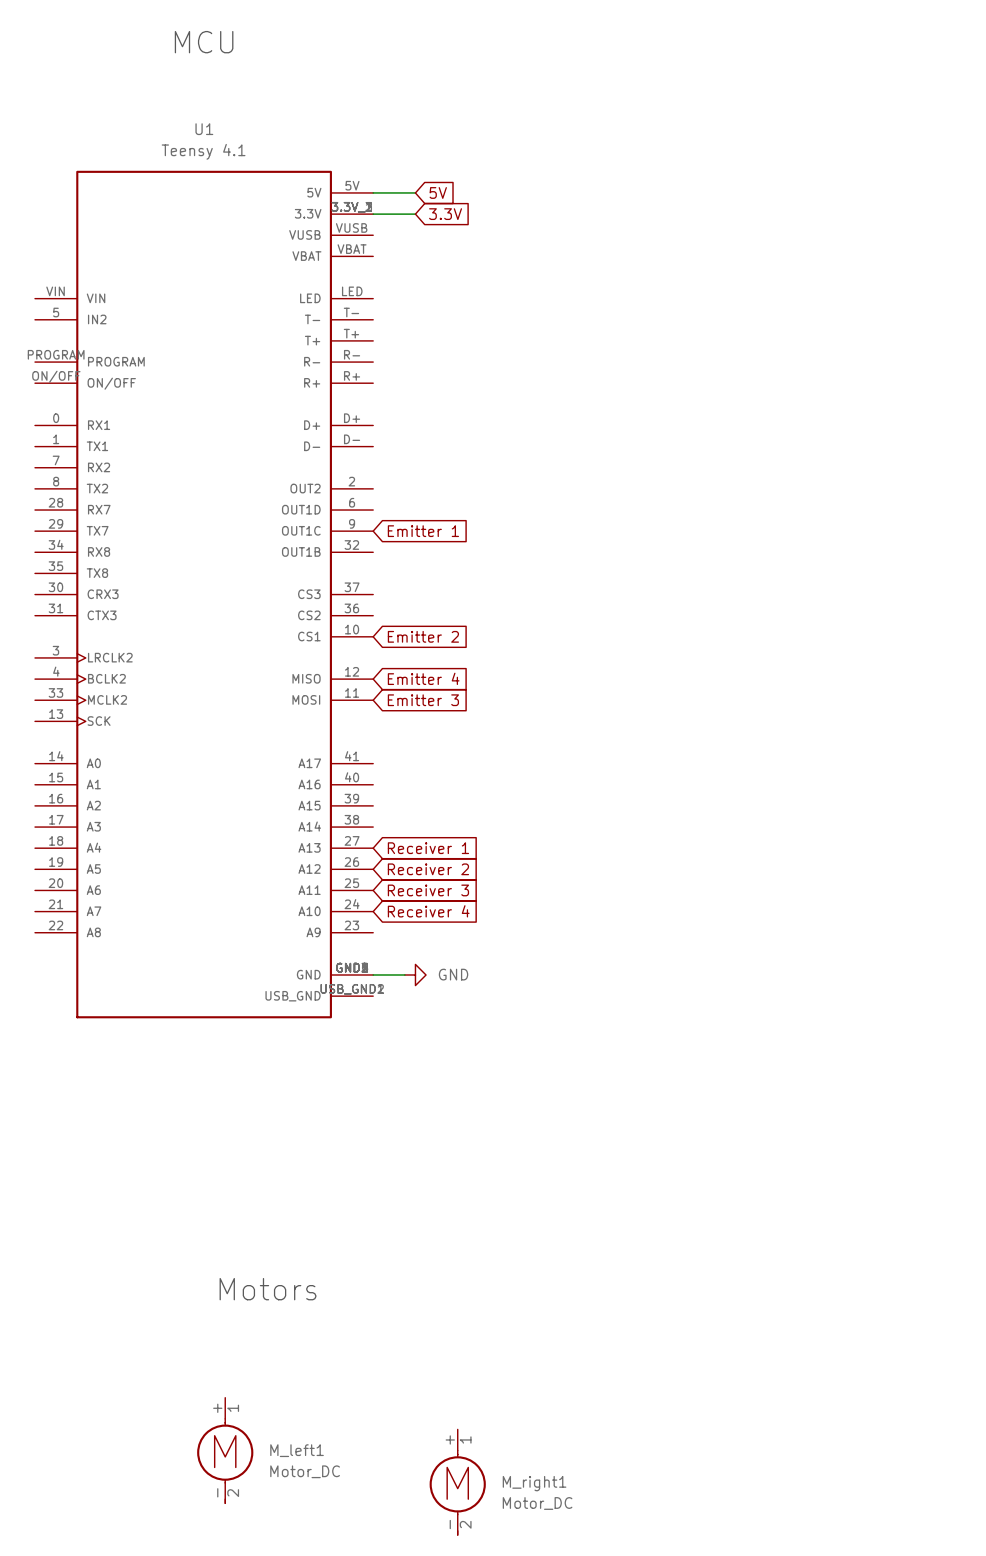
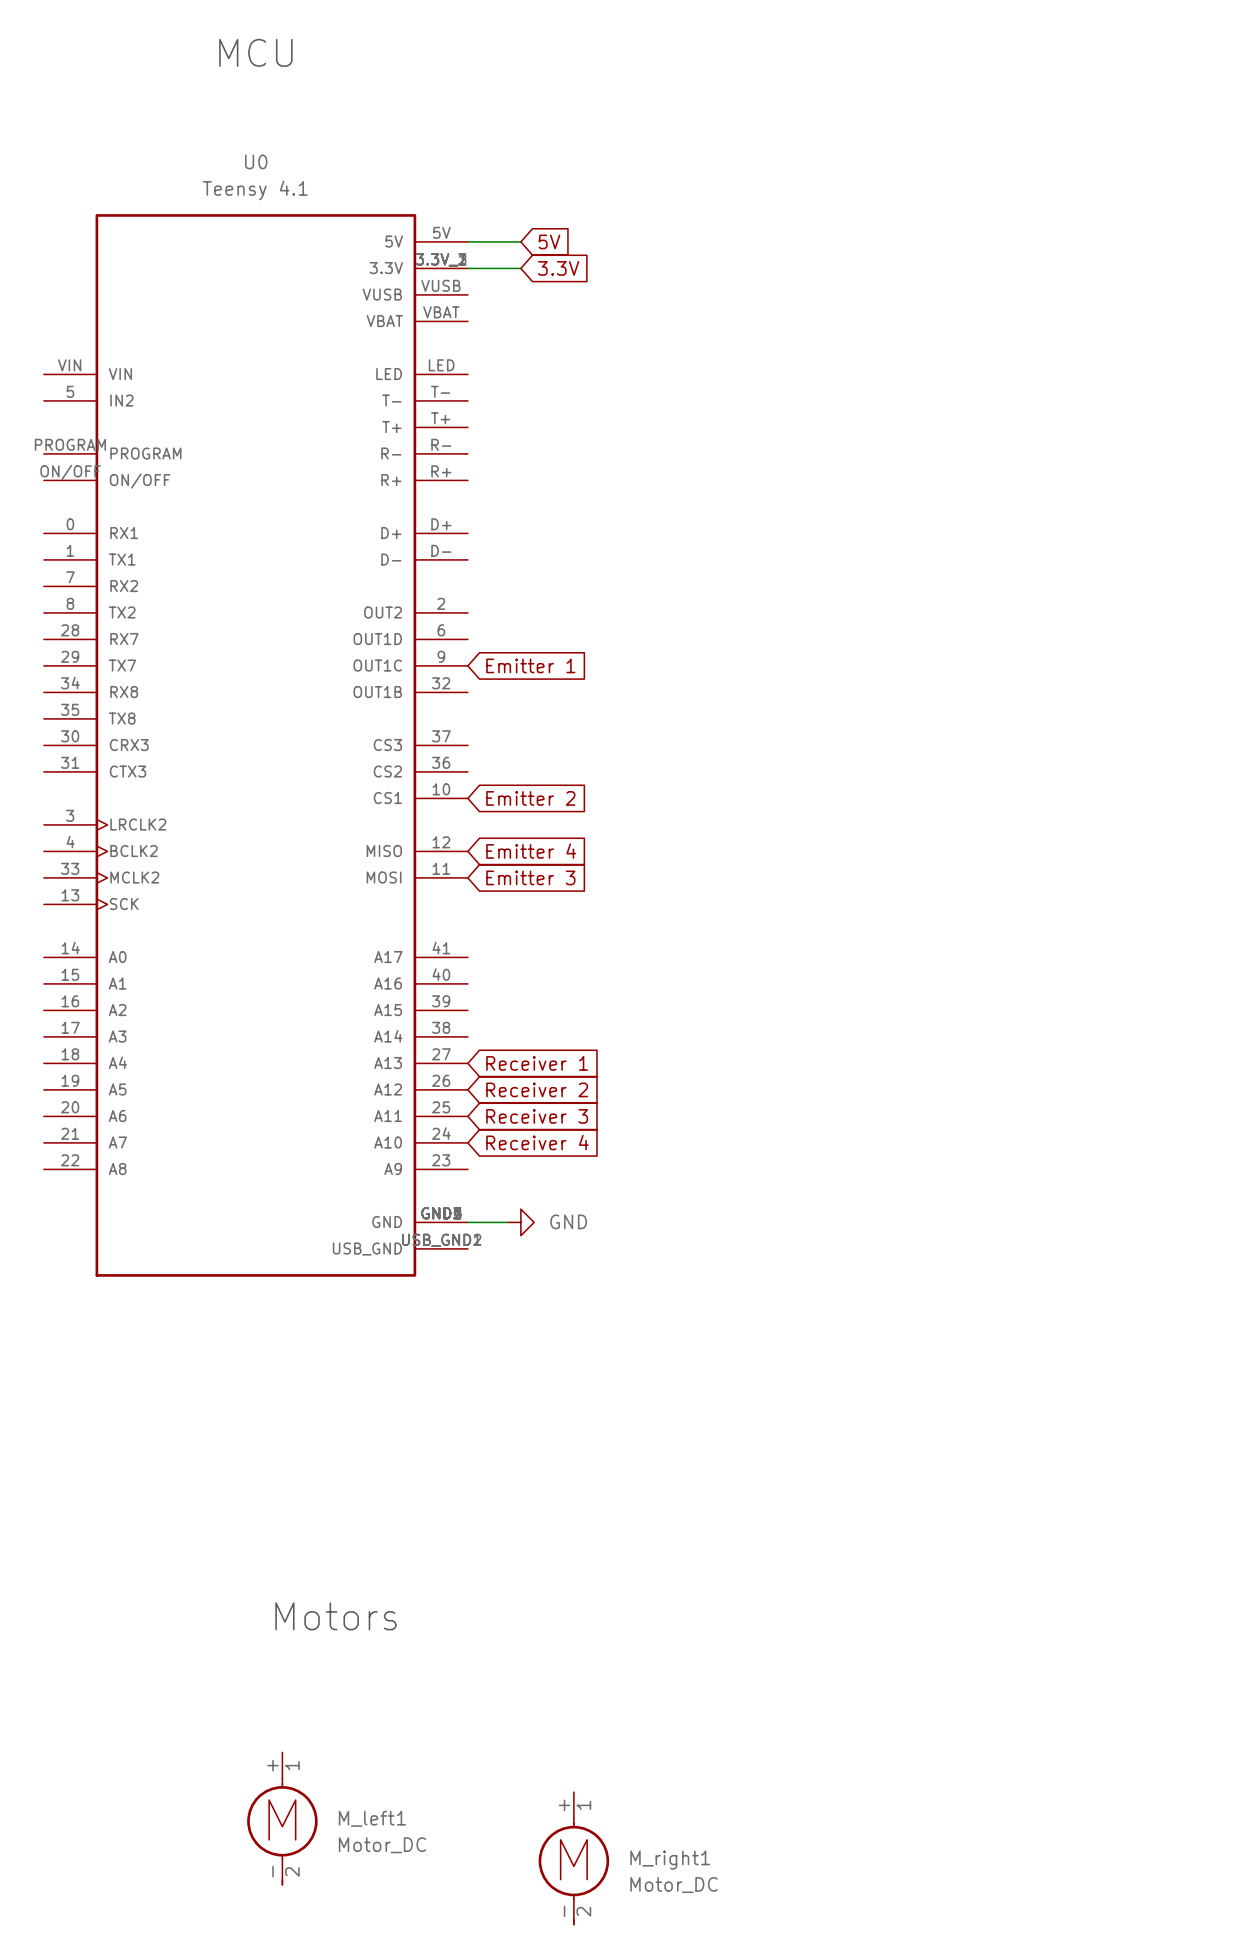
U1 name: U1 (204, 129) -> U0 (256, 161)

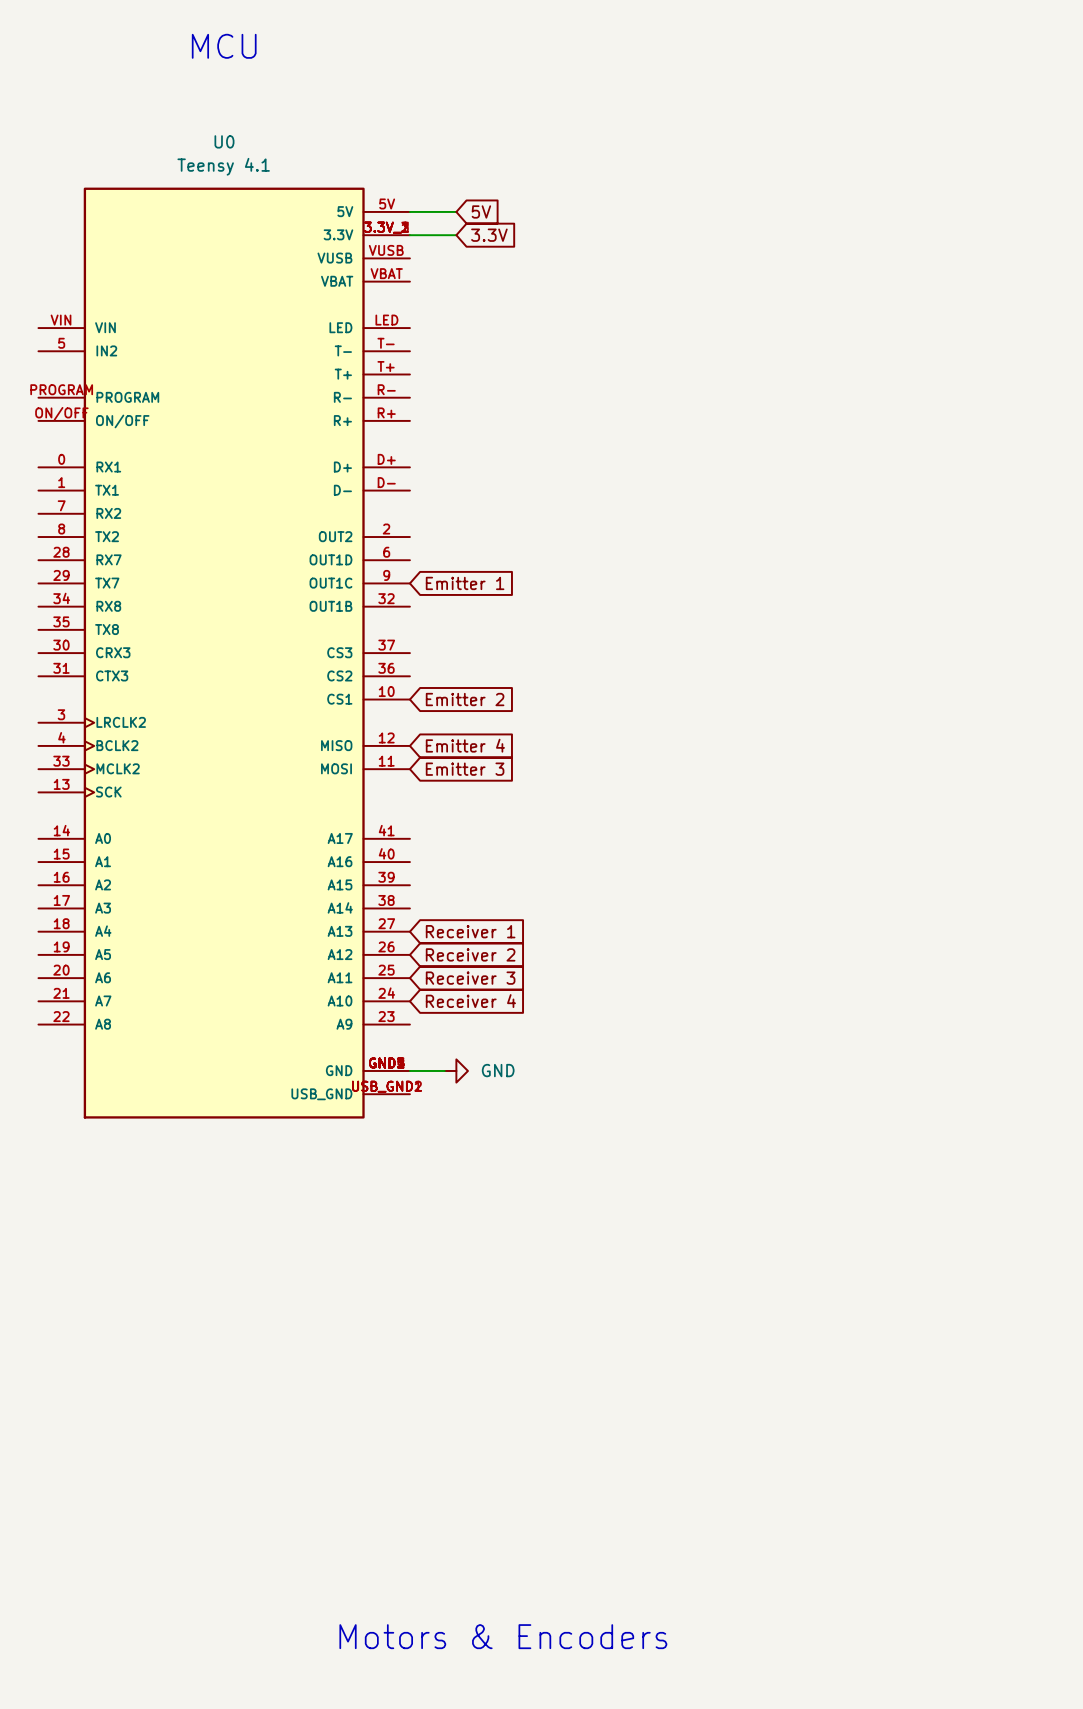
text: Motors (336, 1616) -> none
M_left1: Motor_DC (282, 1818) -> none
M_right1: Motor_DC (573, 1858) -> none
text: none -> Motors & Encoders (503, 1636)

